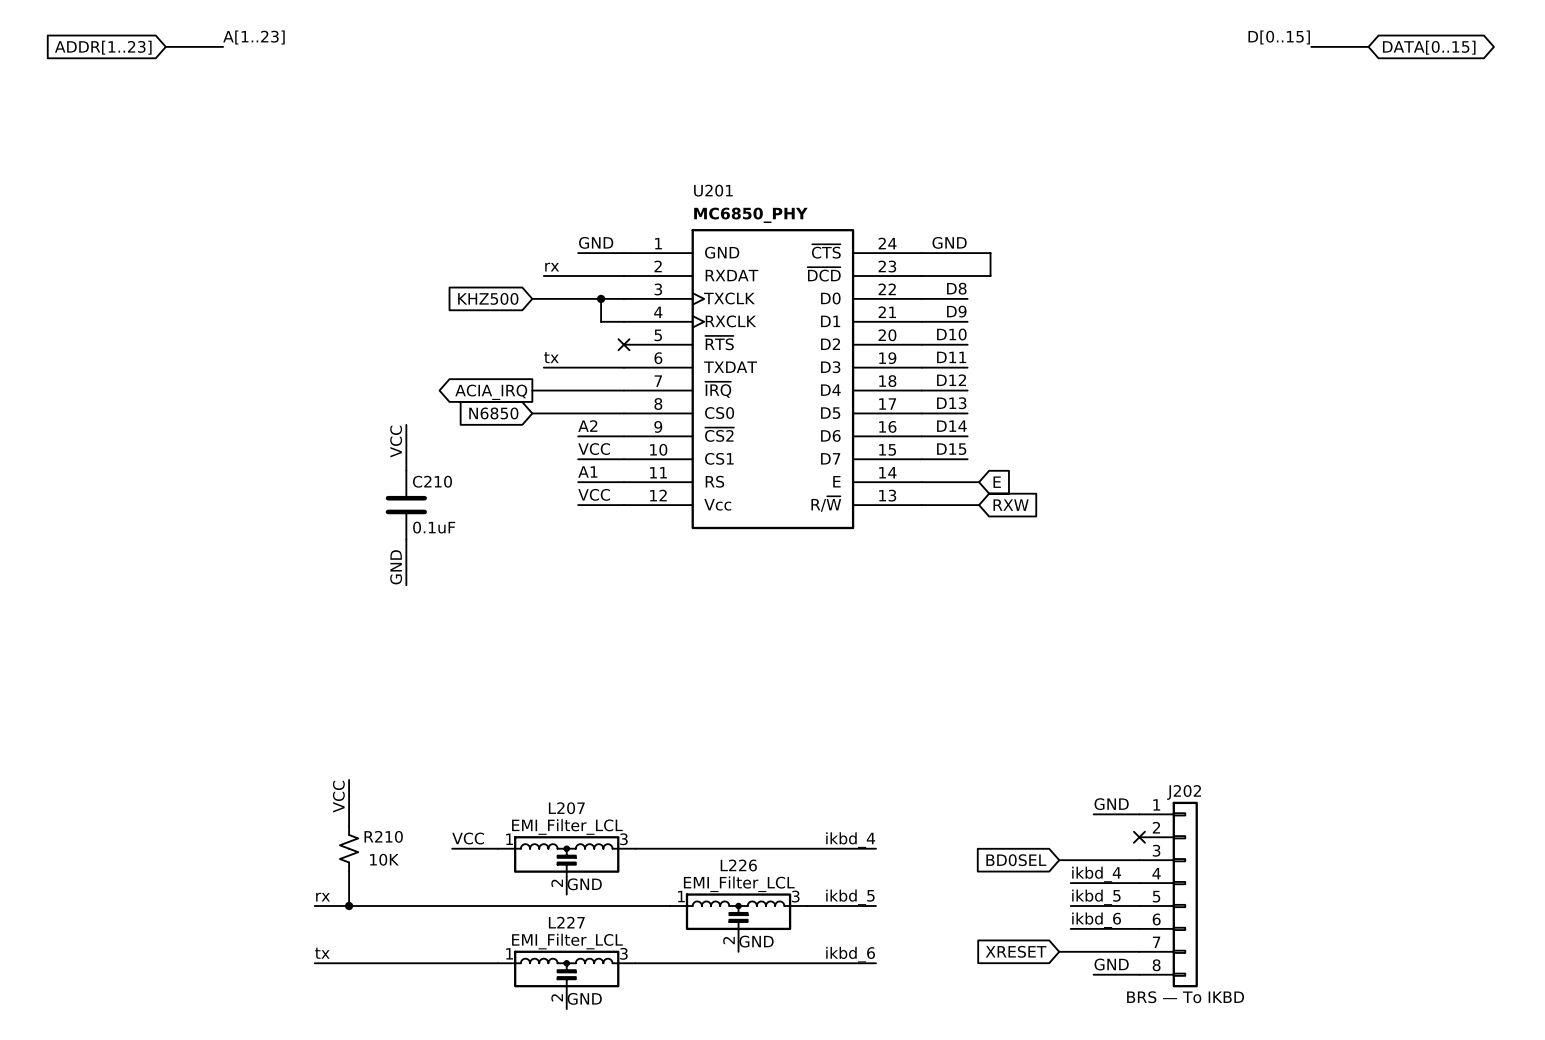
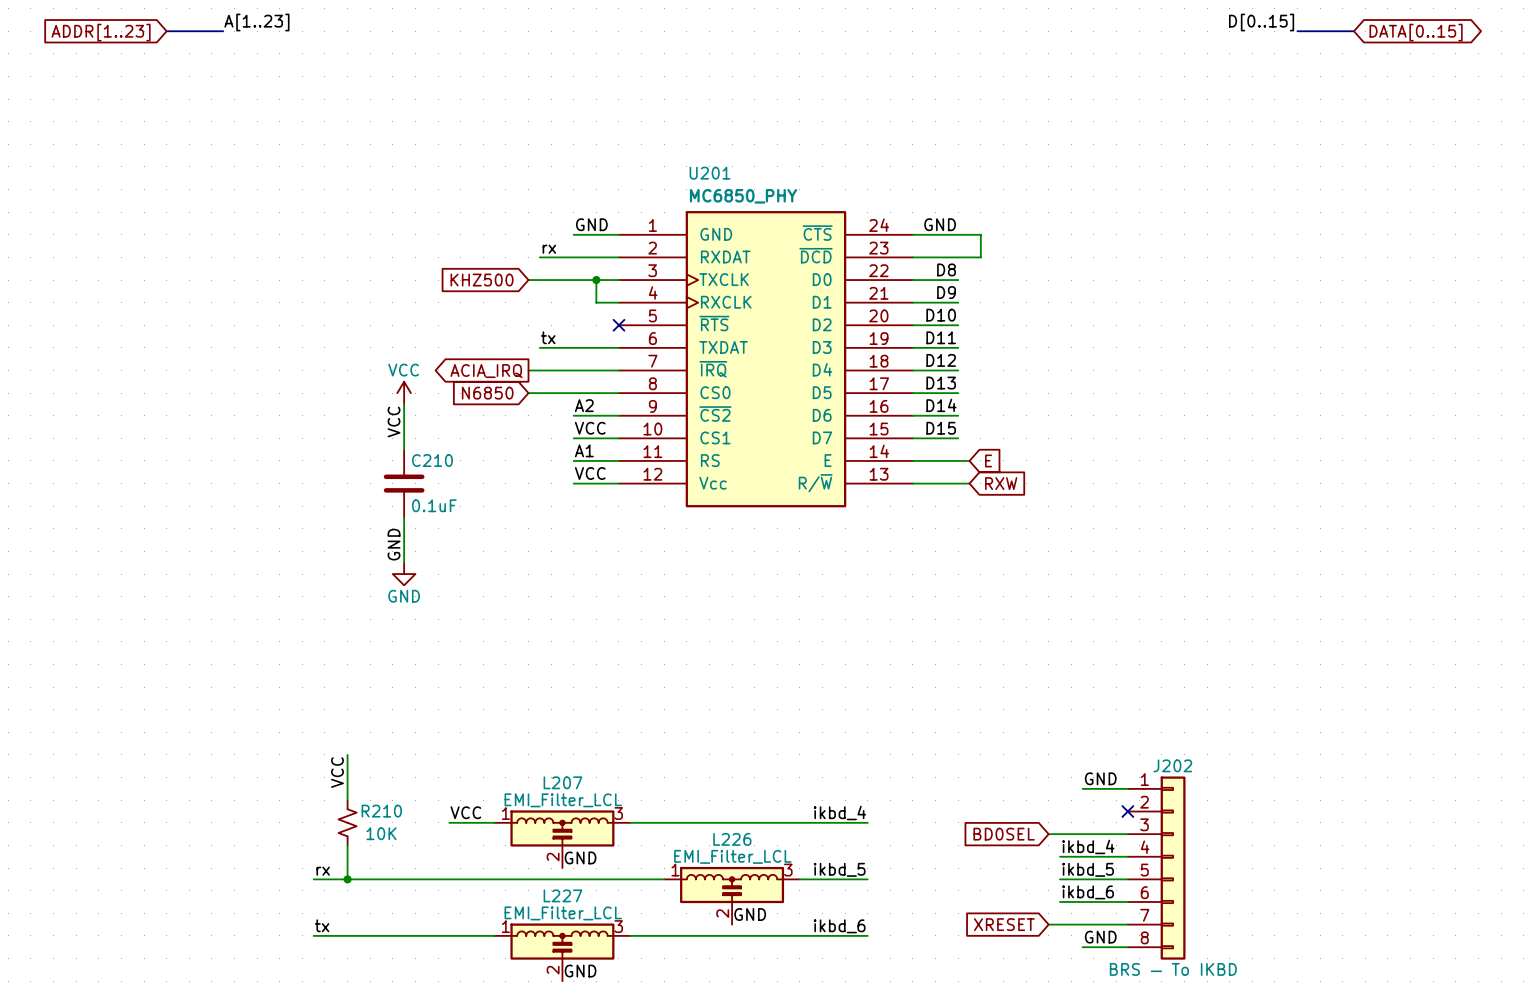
power symbol: none -> VCC (404, 393)
power symbol: none -> GND (404, 574)

